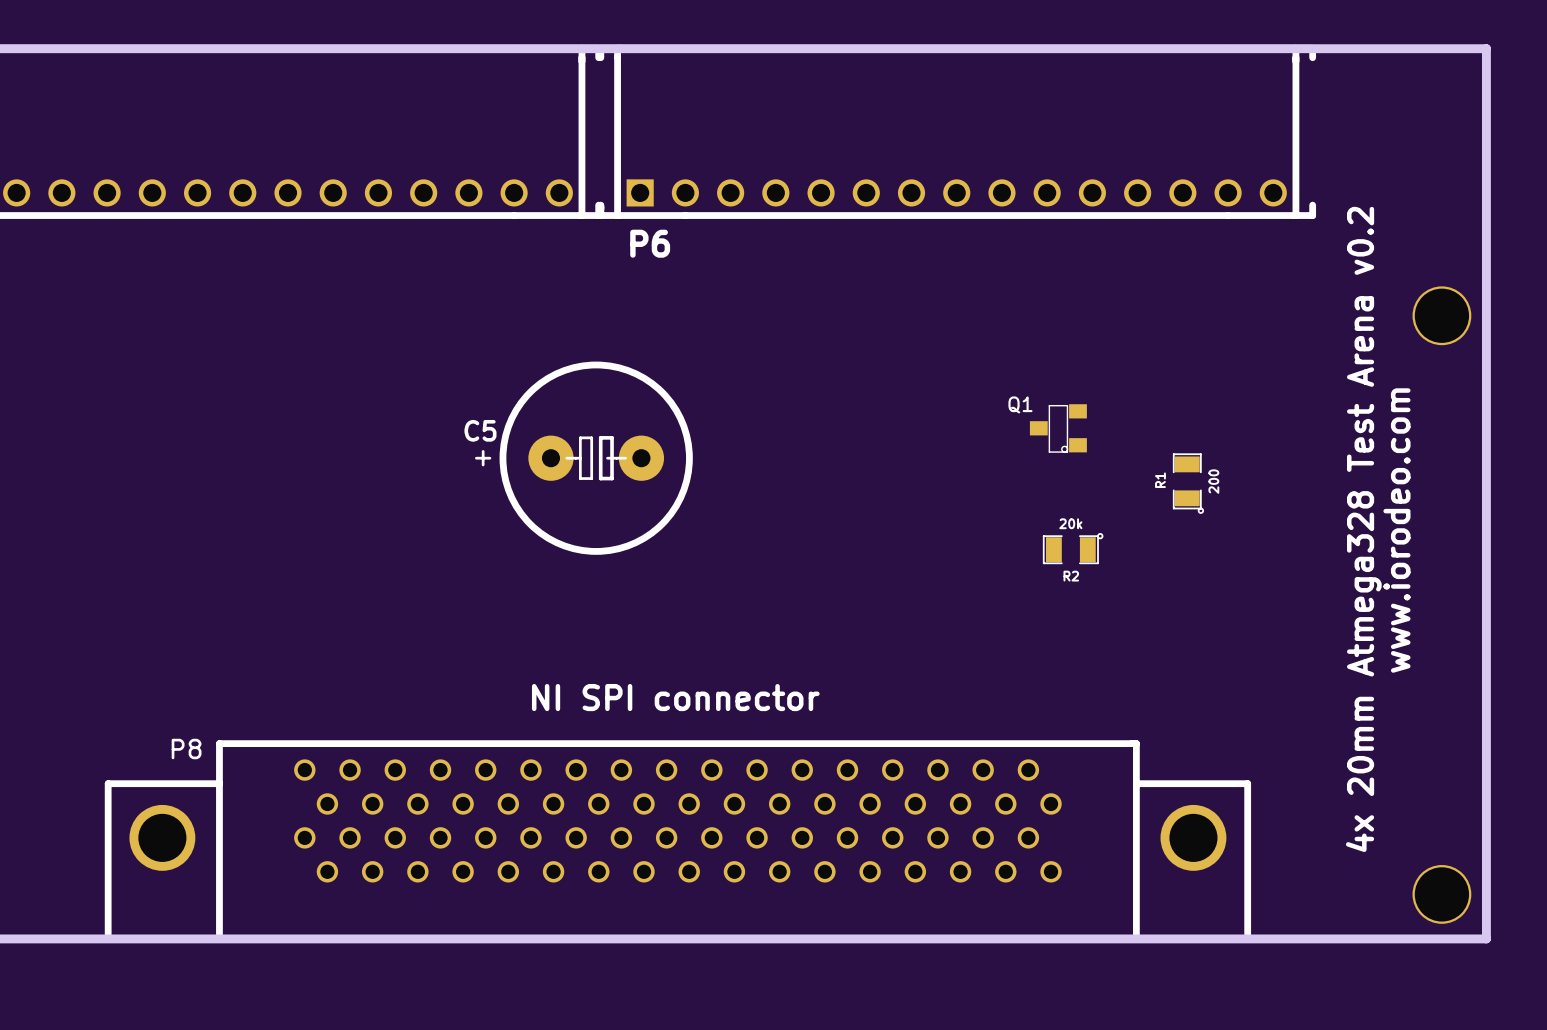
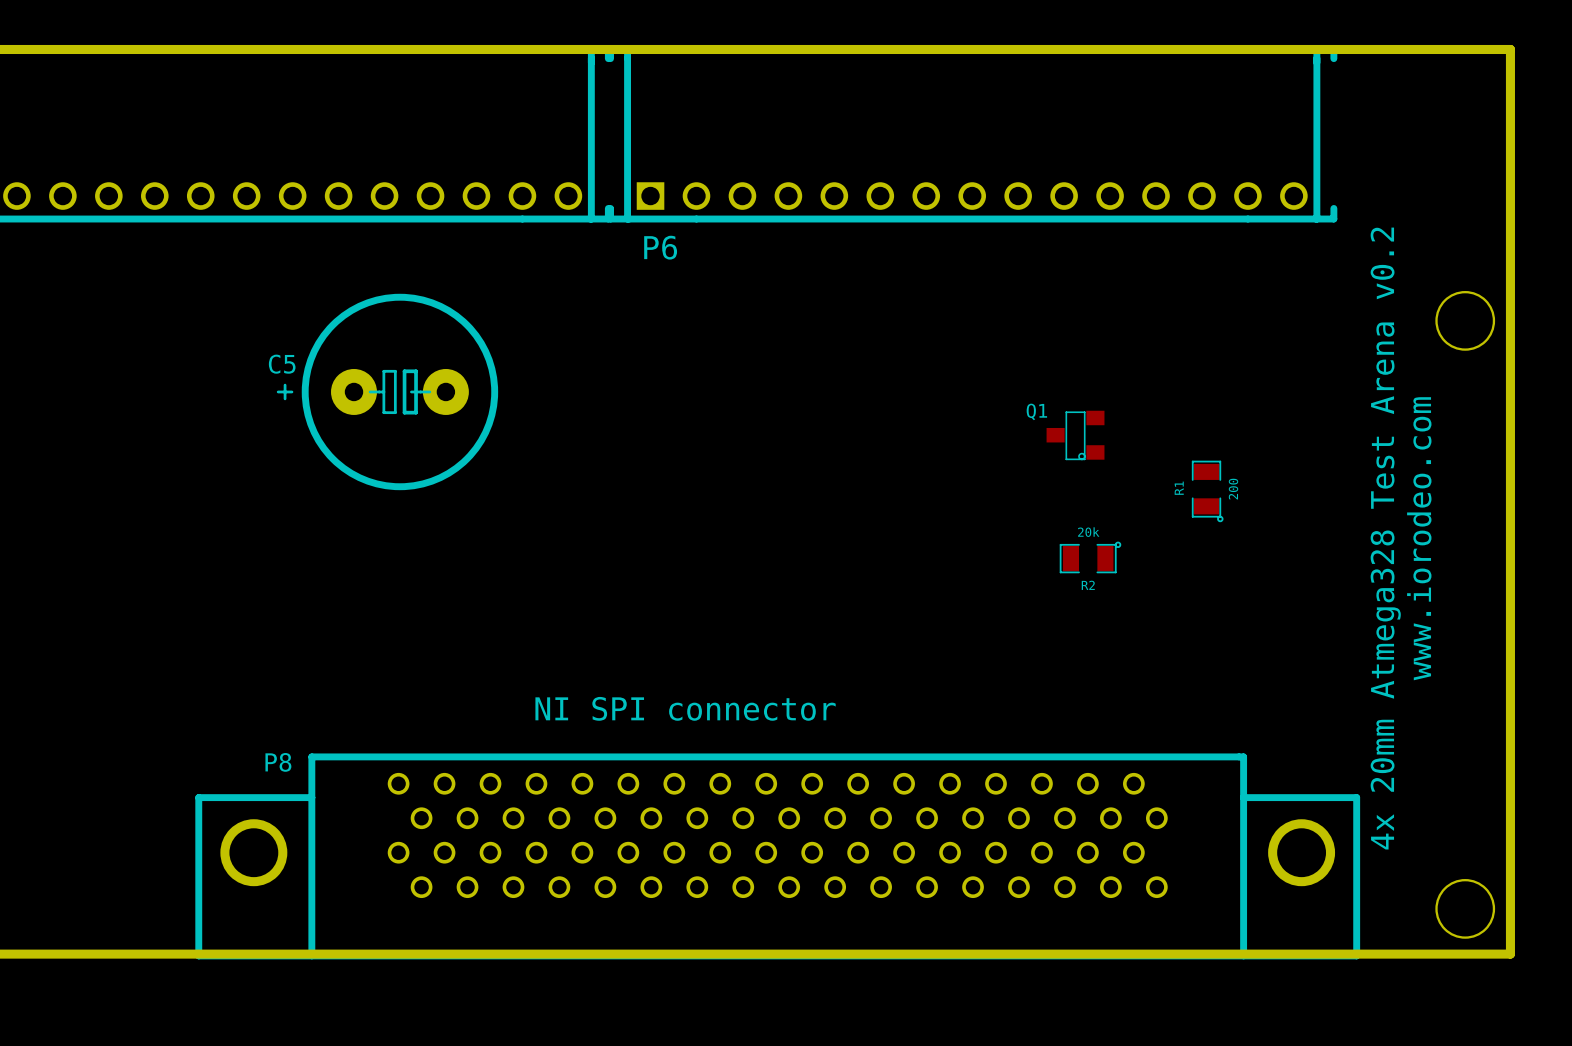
C5 position: (583, 458) -> (387, 391)
P8 position: (677, 841) -> (777, 856)

